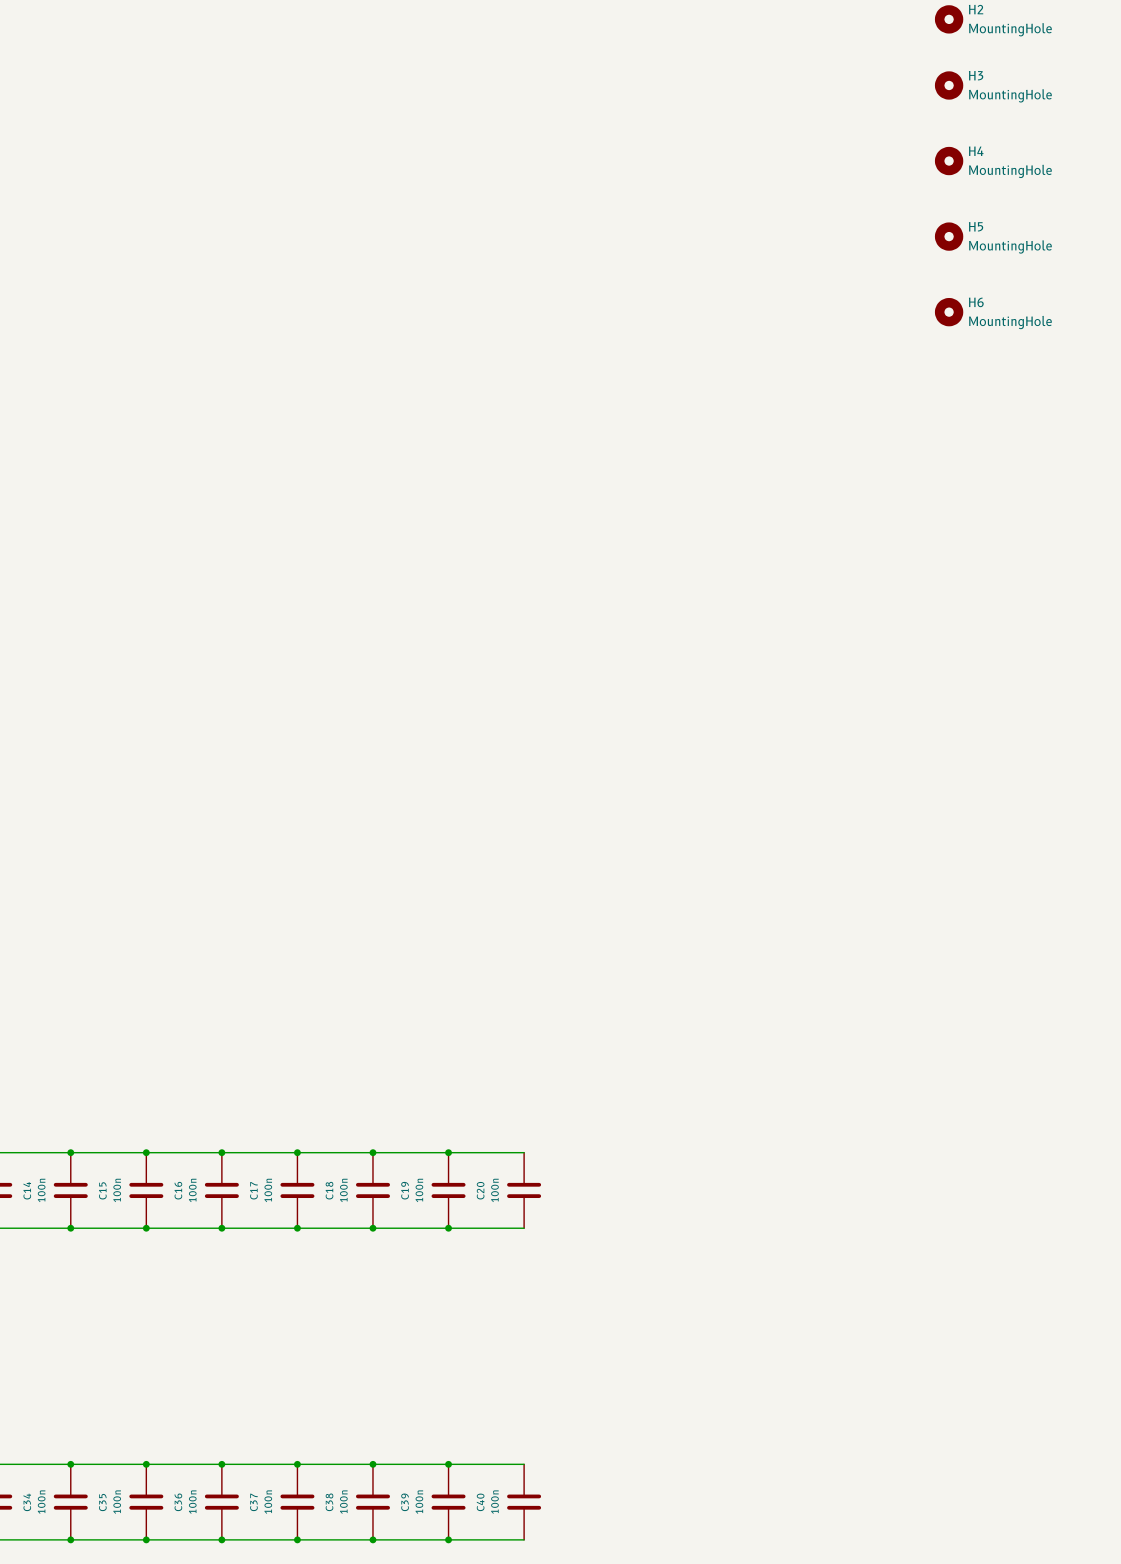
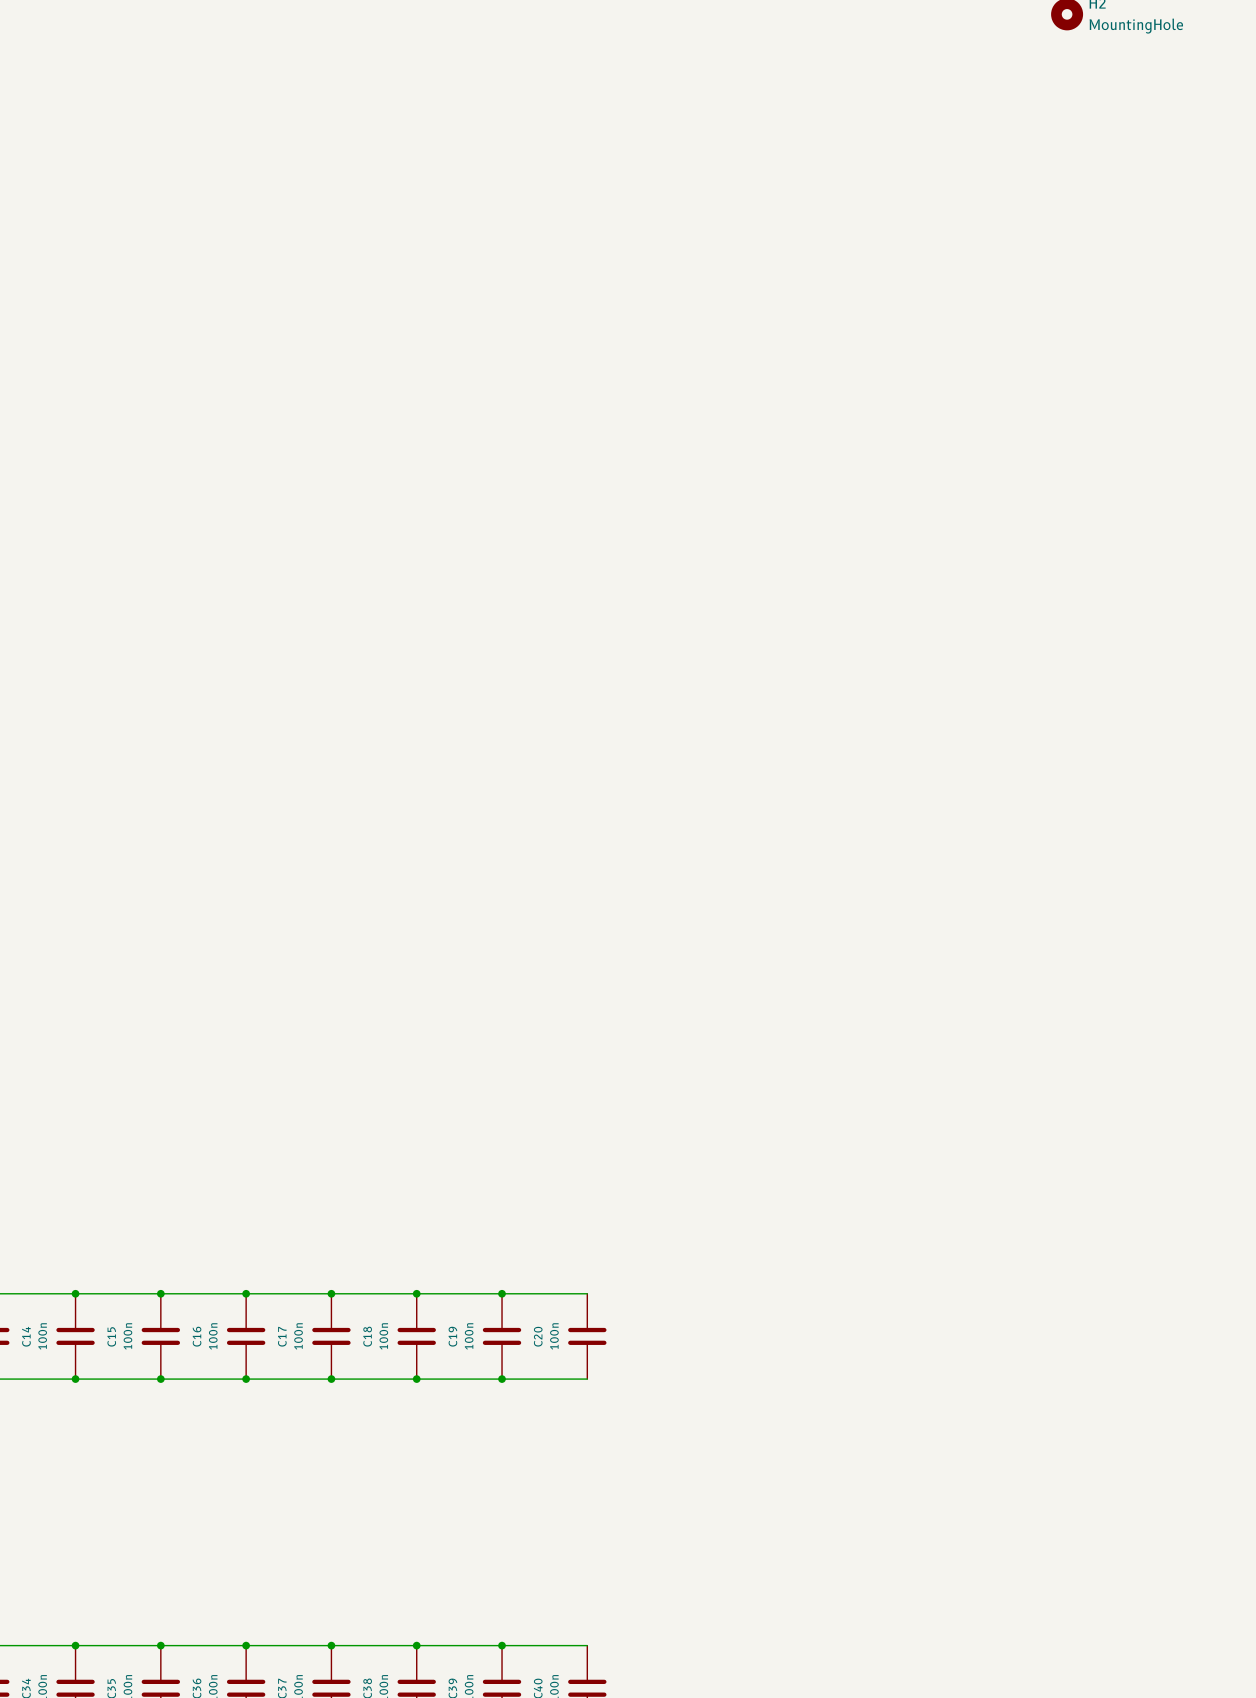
H3: MountingHole (949, 85) -> none
H4: MountingHole (949, 161) -> none
H5: MountingHole (949, 236) -> none
H6: MountingHole (949, 312) -> none

